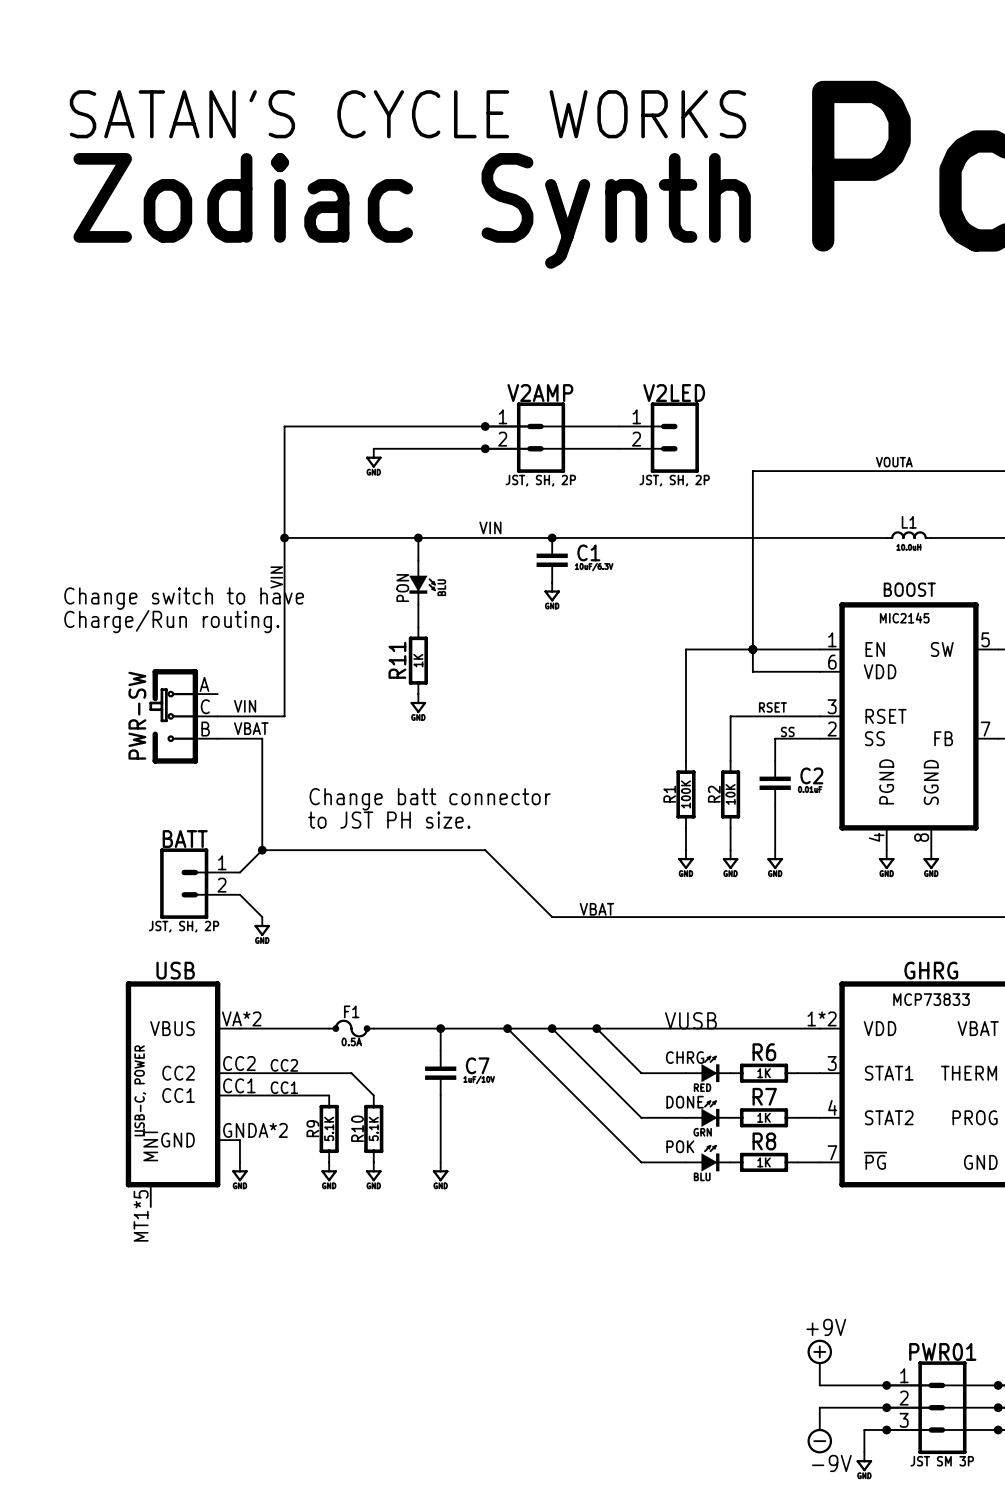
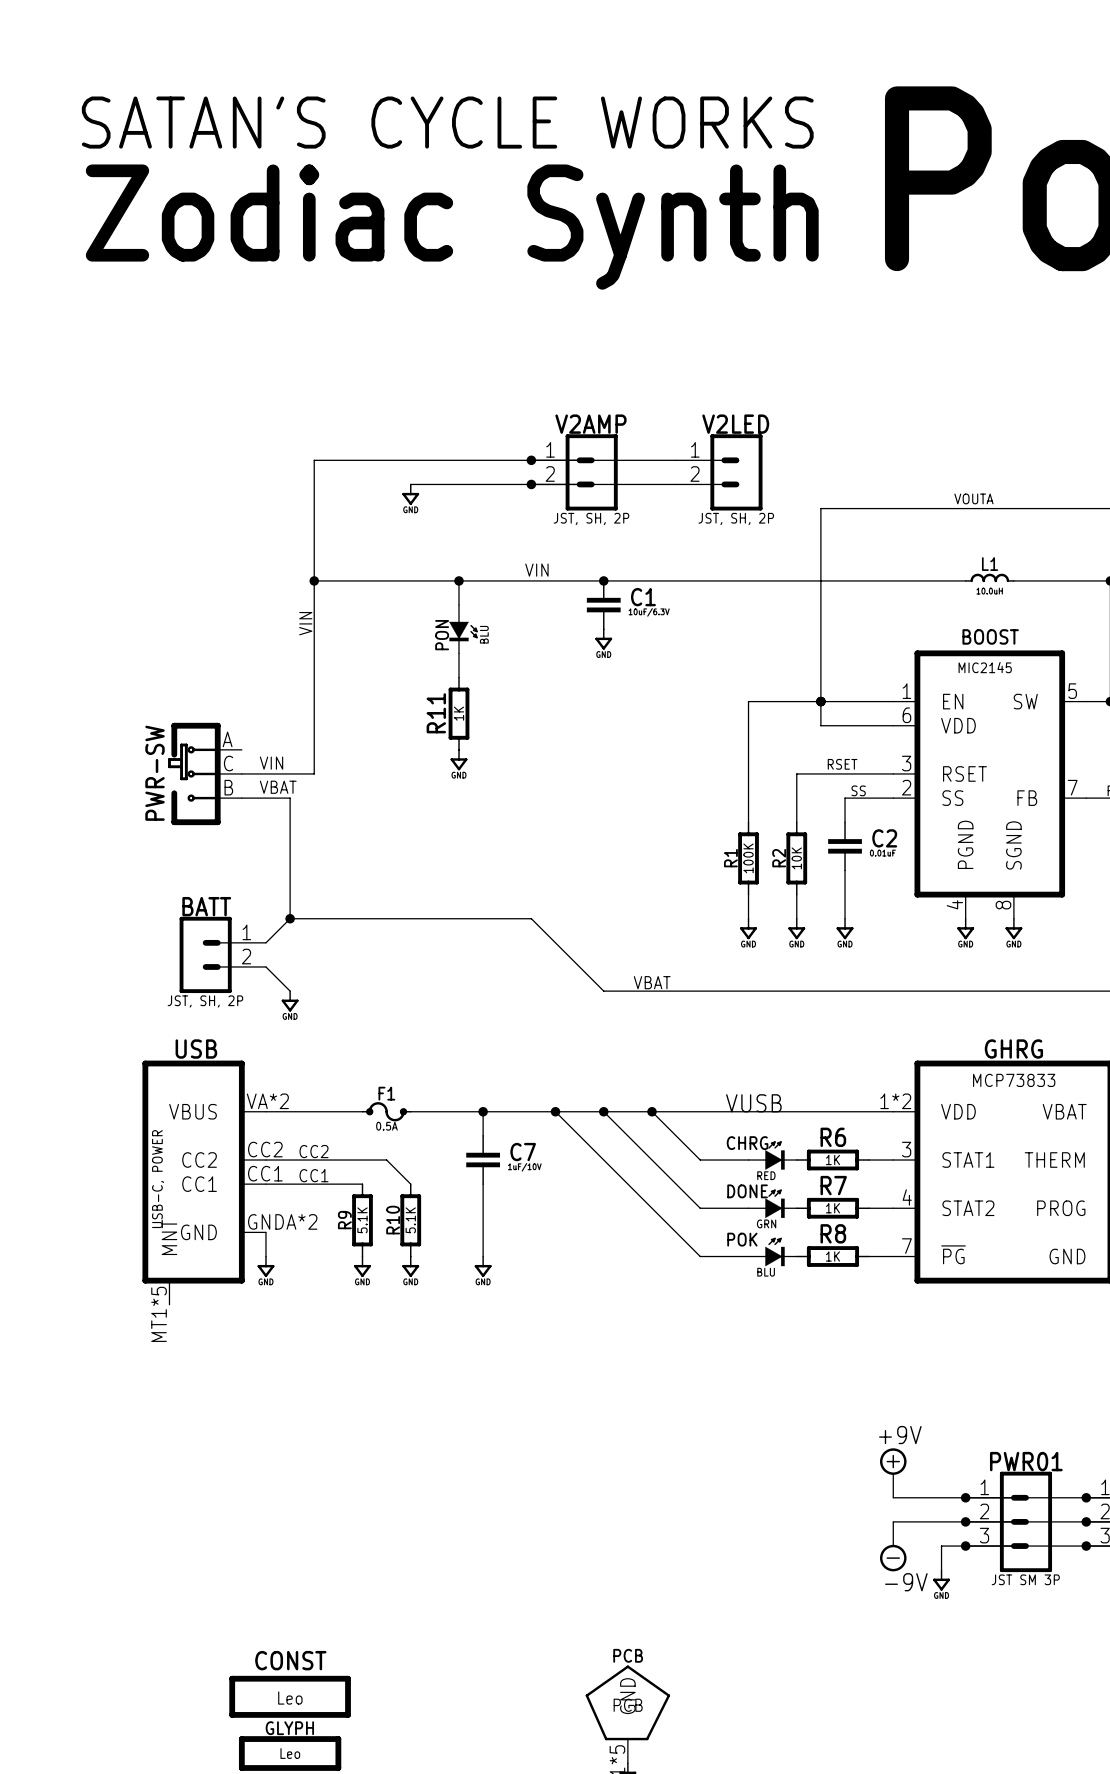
text: Change switch to have (184, 598) -> none
text: Charge/Run routing. (171, 621) -> none
text: Change batt connector (430, 799) -> none
text: to JST PH size. (389, 820) -> none

